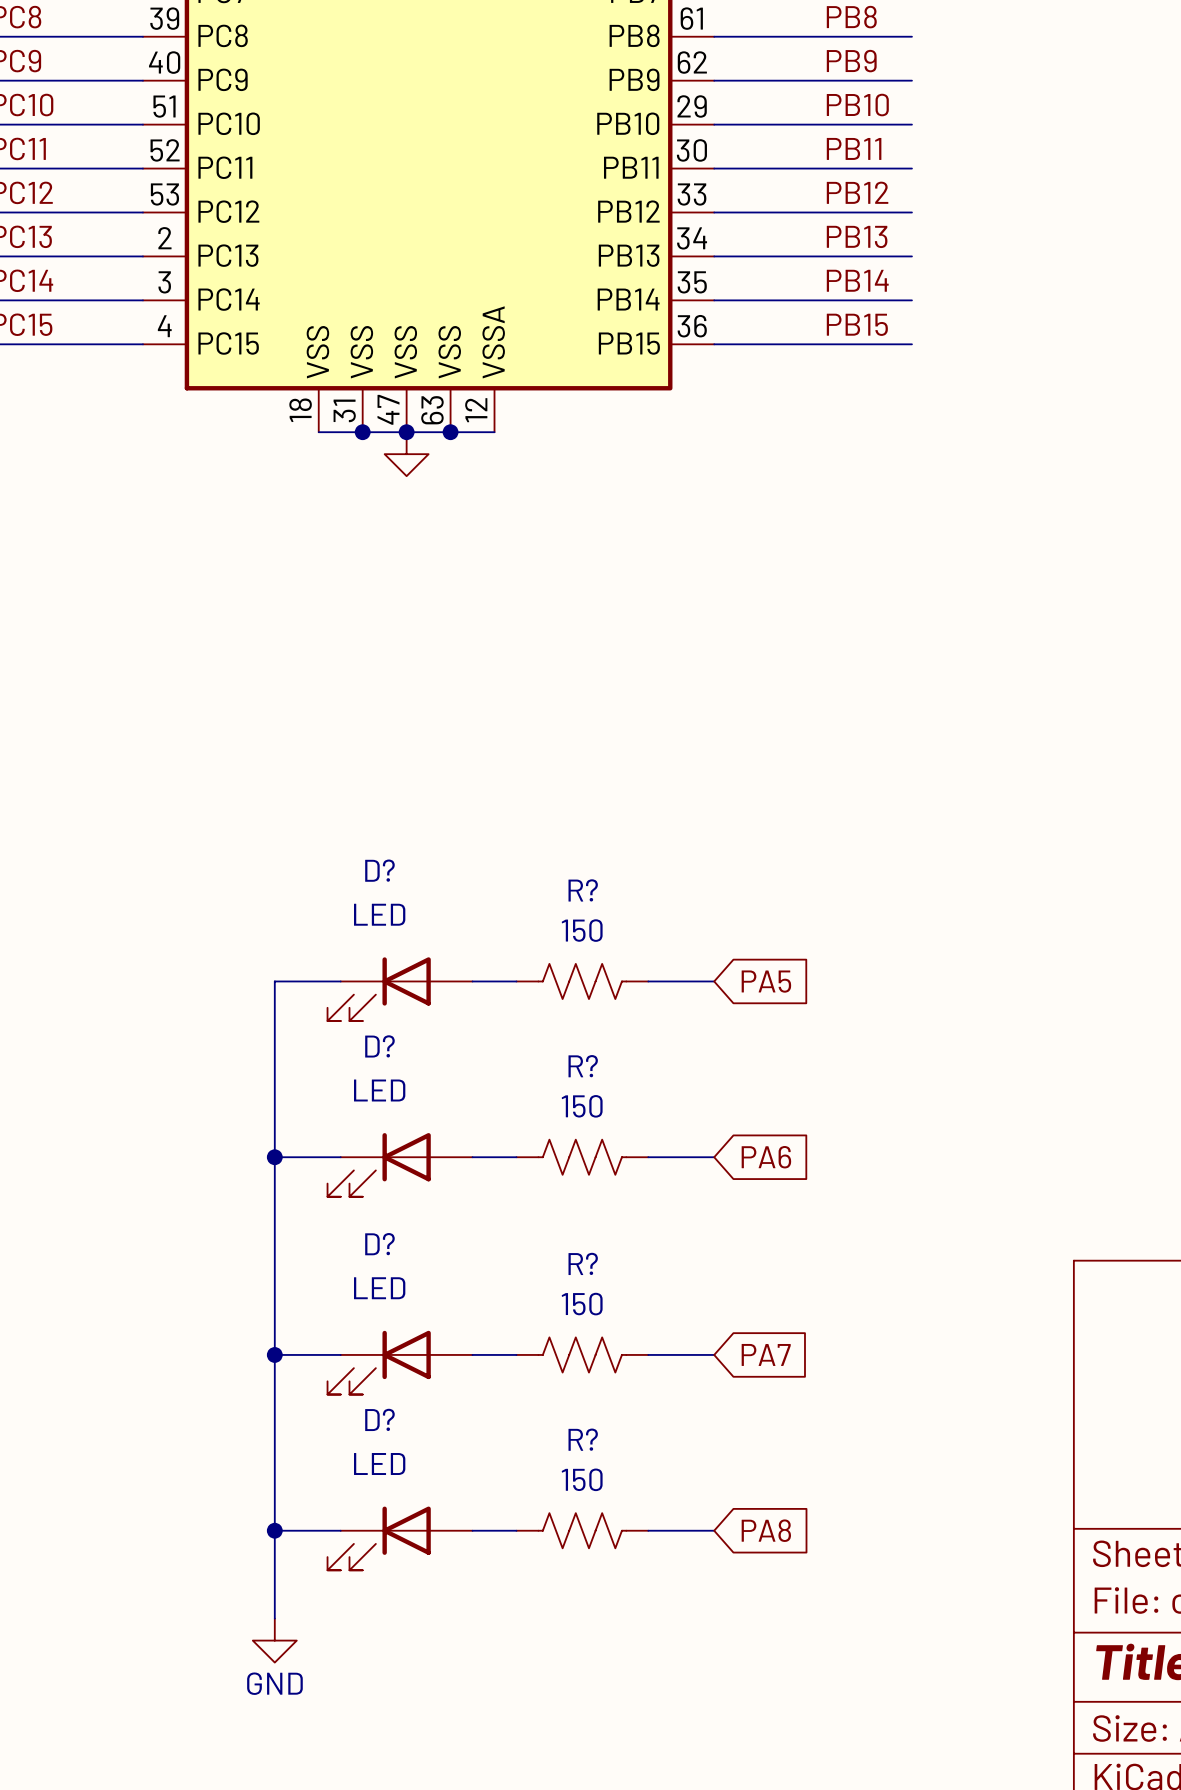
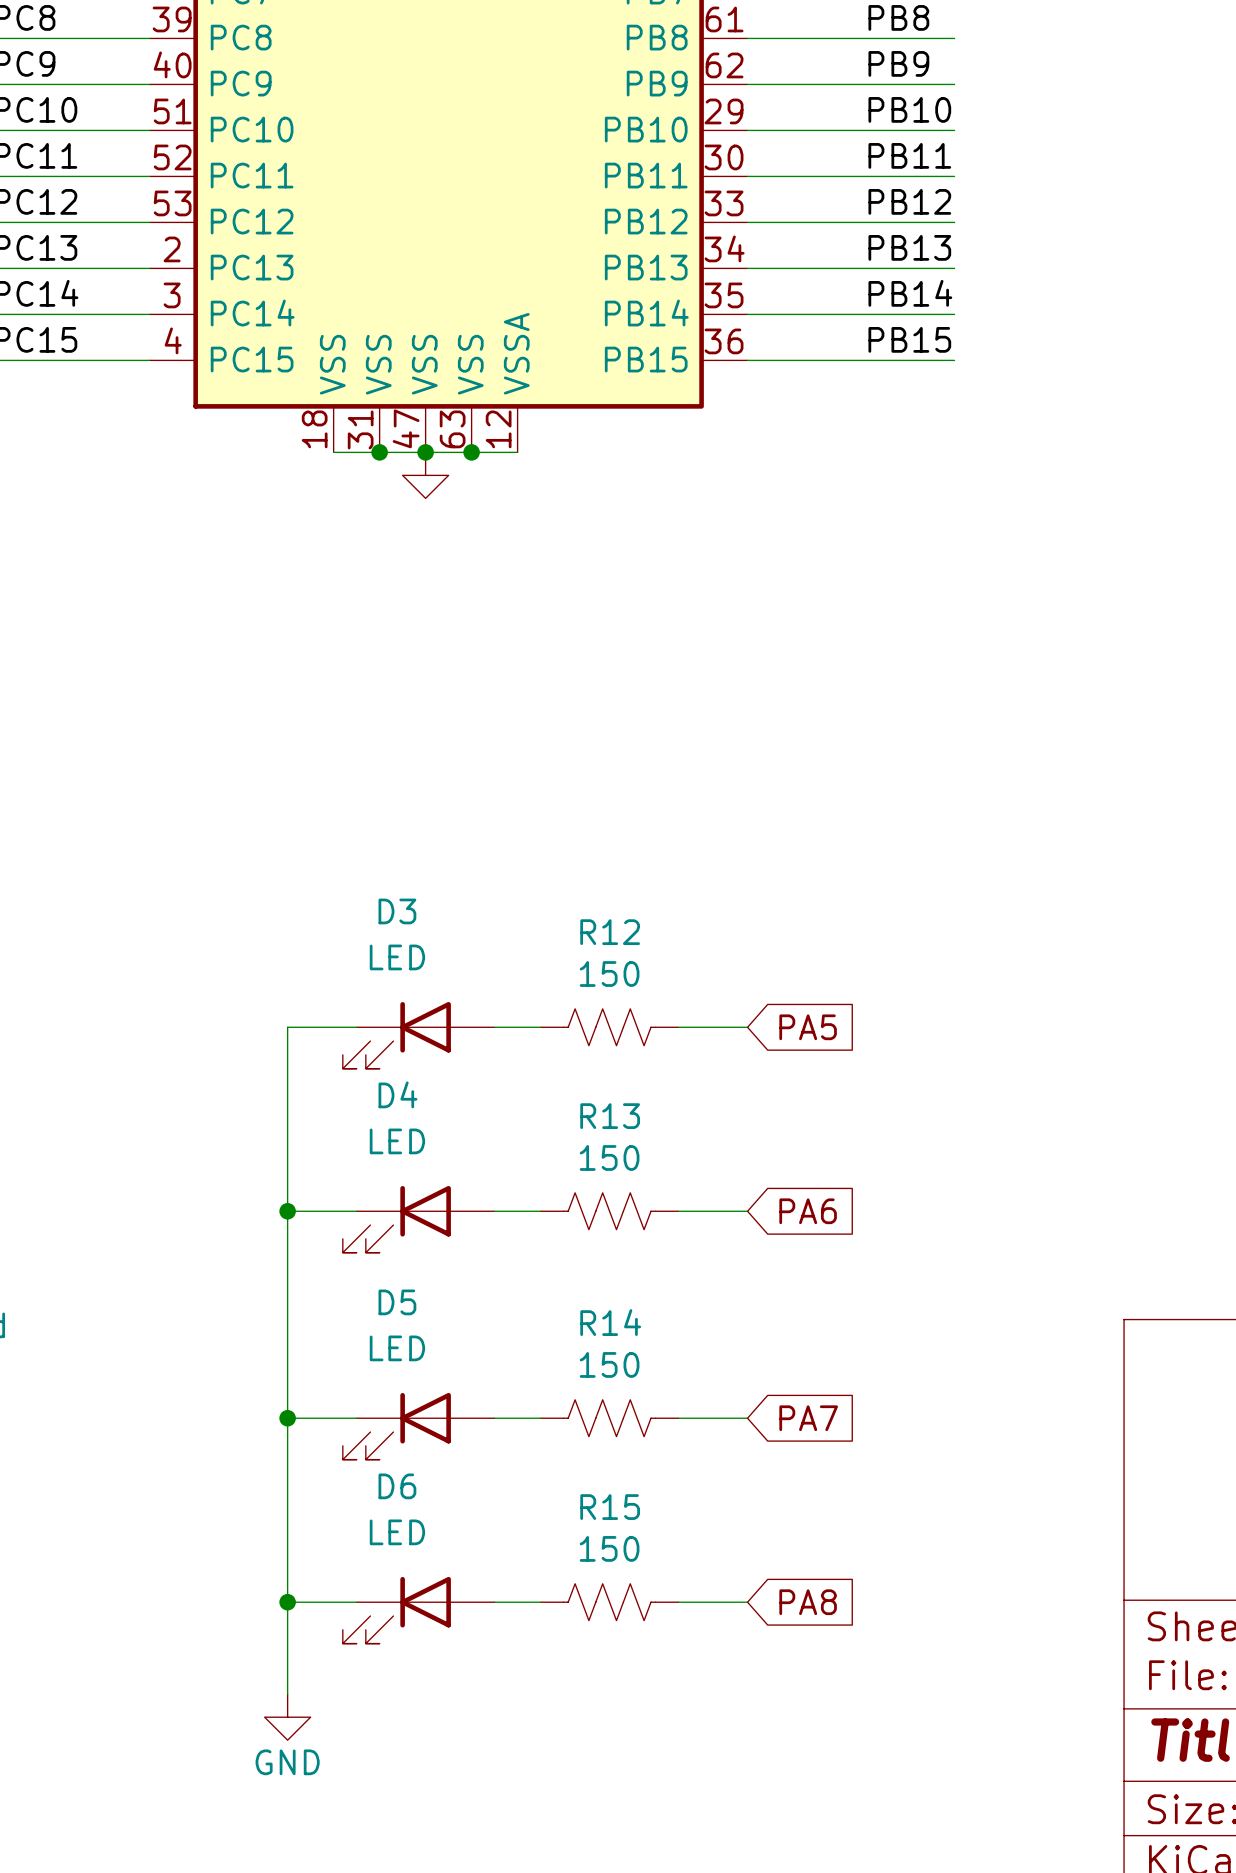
D? name: D? (379, 870) -> D3 (397, 911)
R? name: R? (583, 890) -> R12 (610, 932)
D? name: D? (379, 1046) -> D4 (397, 1094)
R? name: R? (583, 1066) -> R13 (610, 1116)
D? name: D? (379, 1244) -> D5 (397, 1302)
R? name: R? (583, 1263) -> R14 (610, 1322)
D? name: D? (379, 1419) -> D6 (397, 1486)
R? name: R? (583, 1439) -> R15 (610, 1507)

